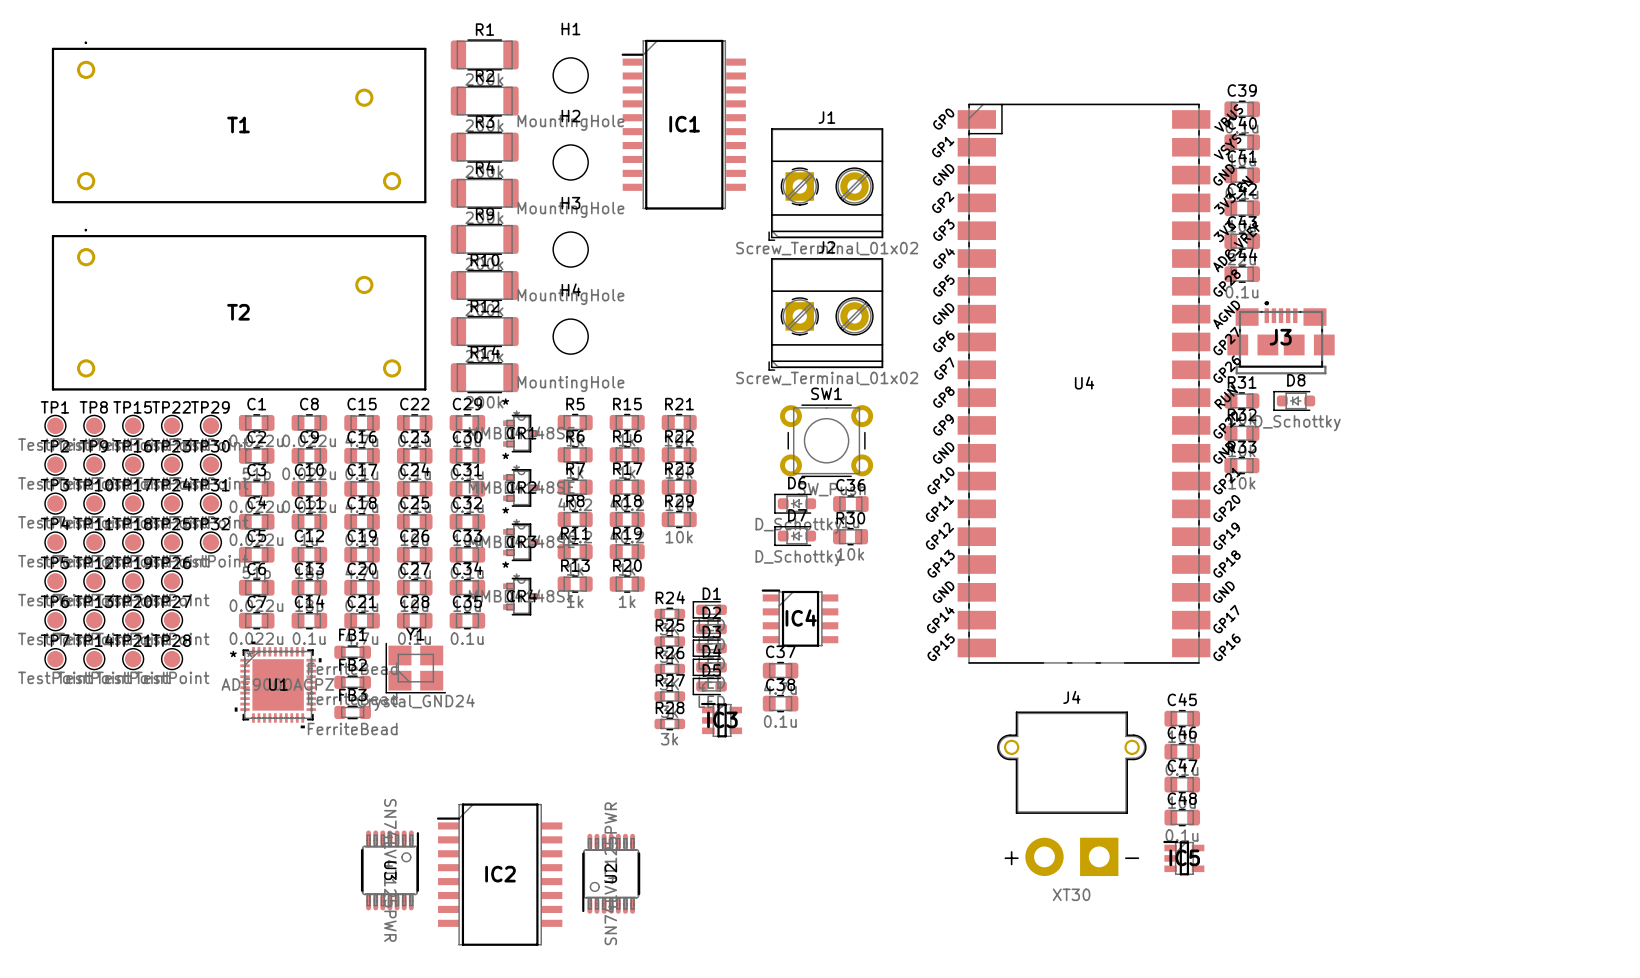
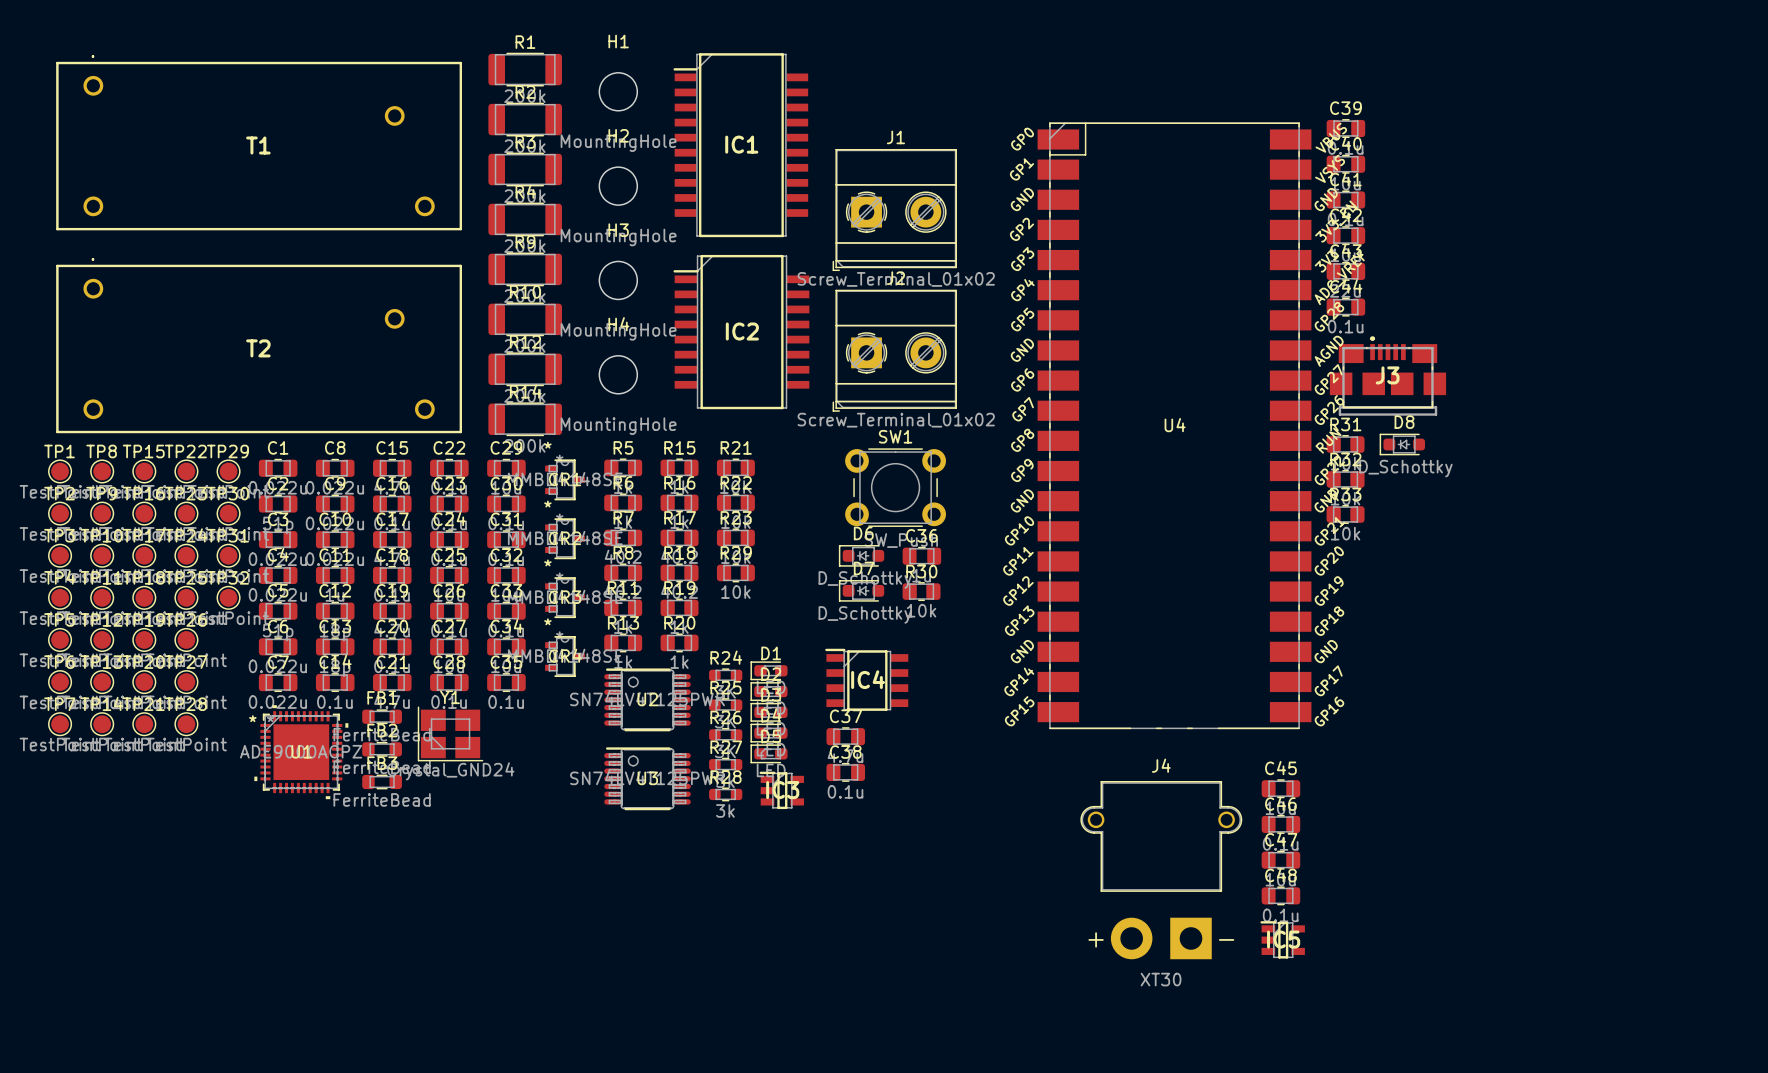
U3 rotation: 0° (389, 870) -> 90° counterclockwise (647, 778)
U3 position: (389, 870) -> (647, 778)
U2 rotation: 0° (611, 873) -> 90° clockwise (647, 699)
U2 position: (611, 873) -> (647, 699)
IC2 position: (499, 874) -> (741, 332)

